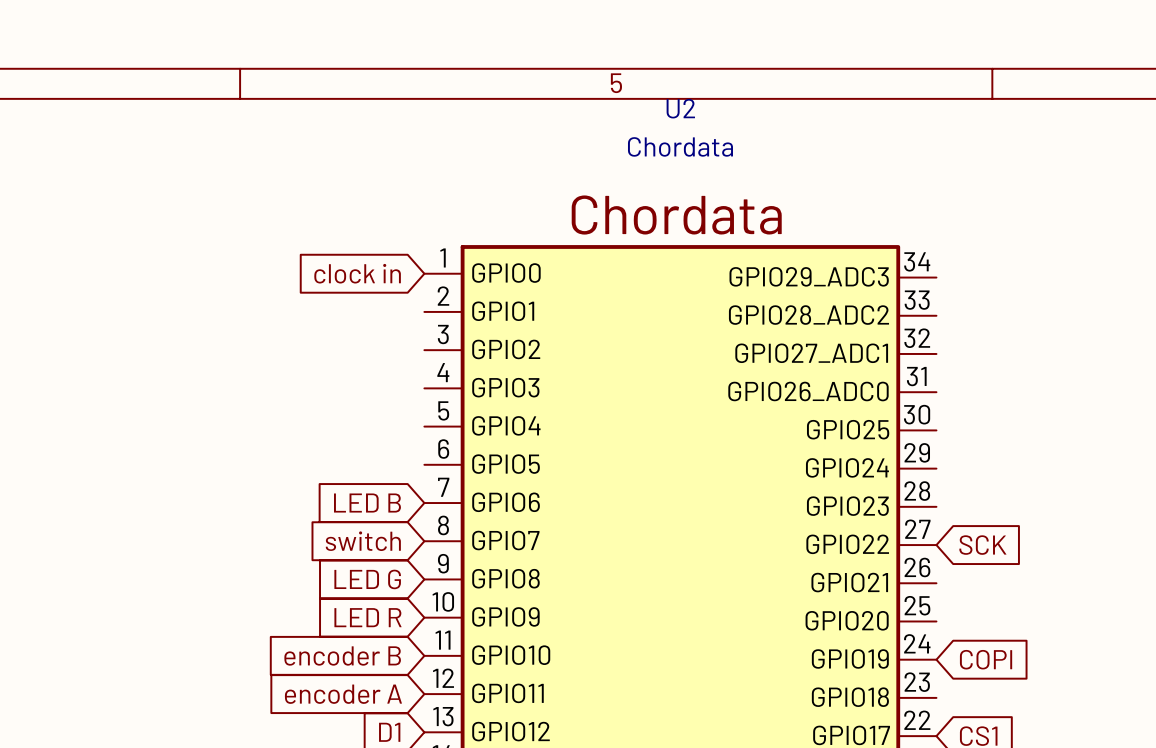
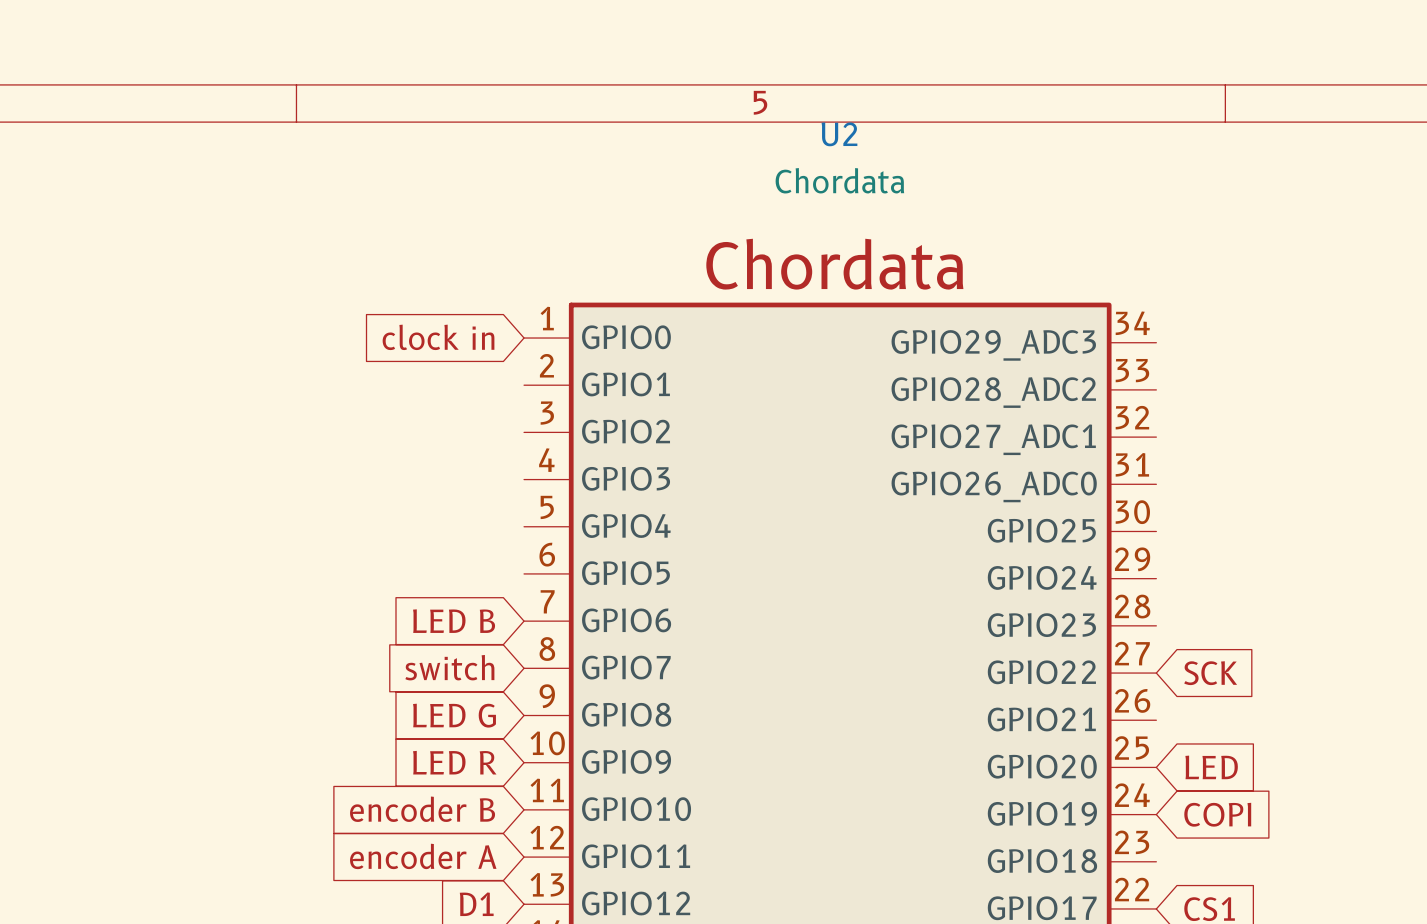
global label: none -> LED (1211, 767)

